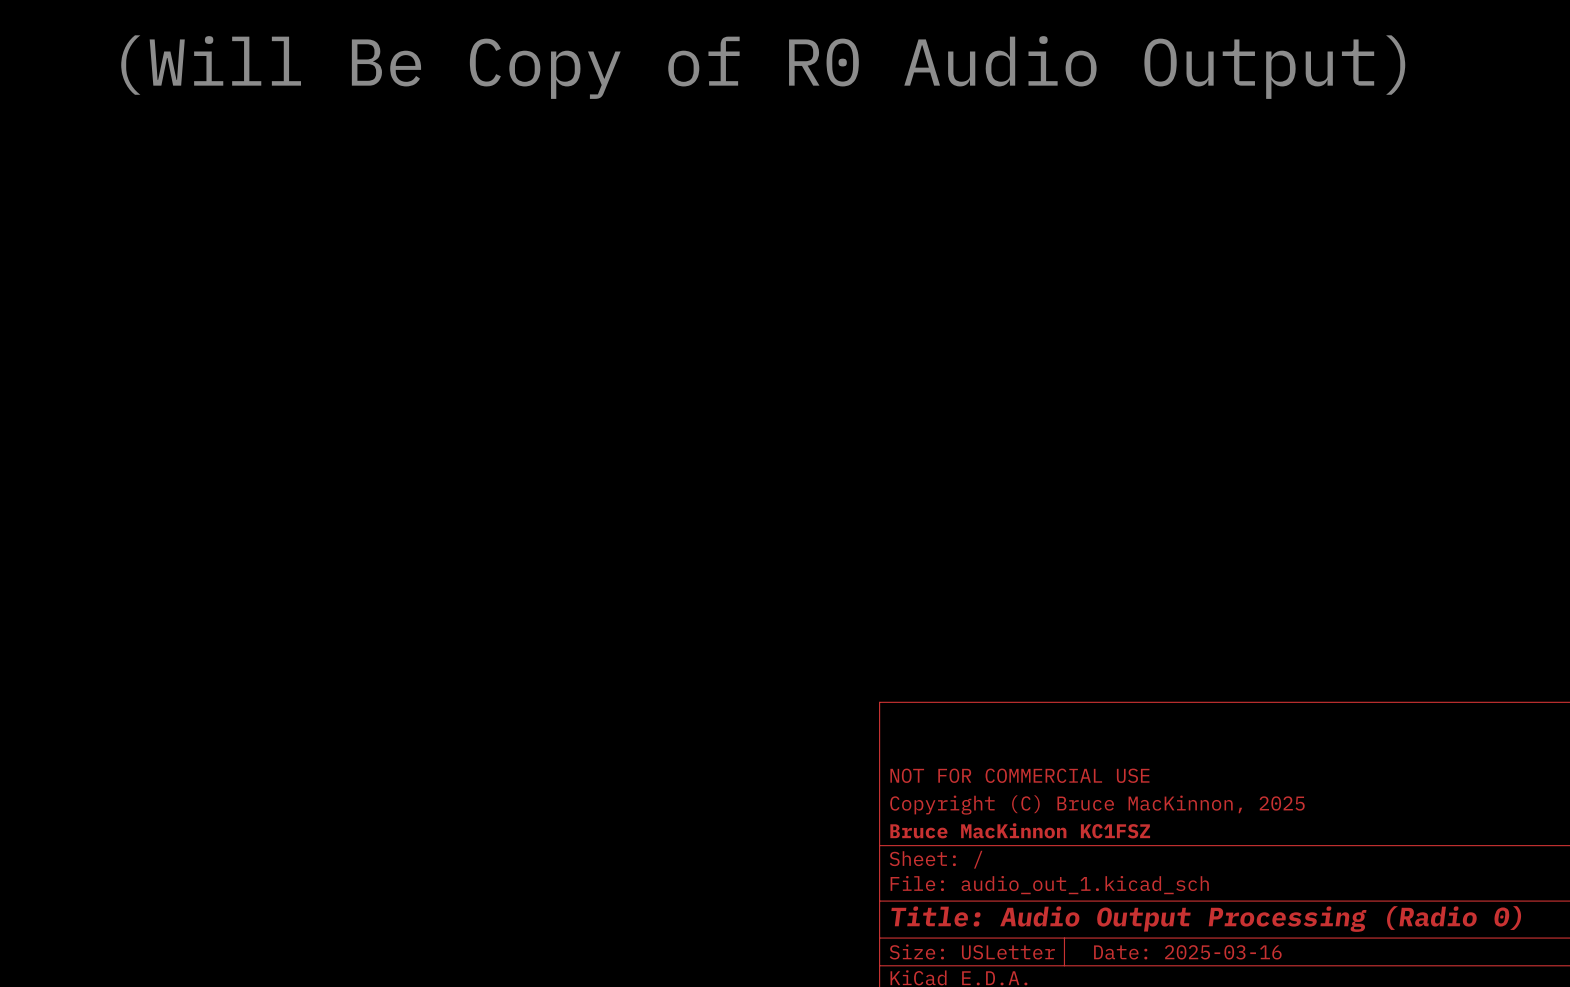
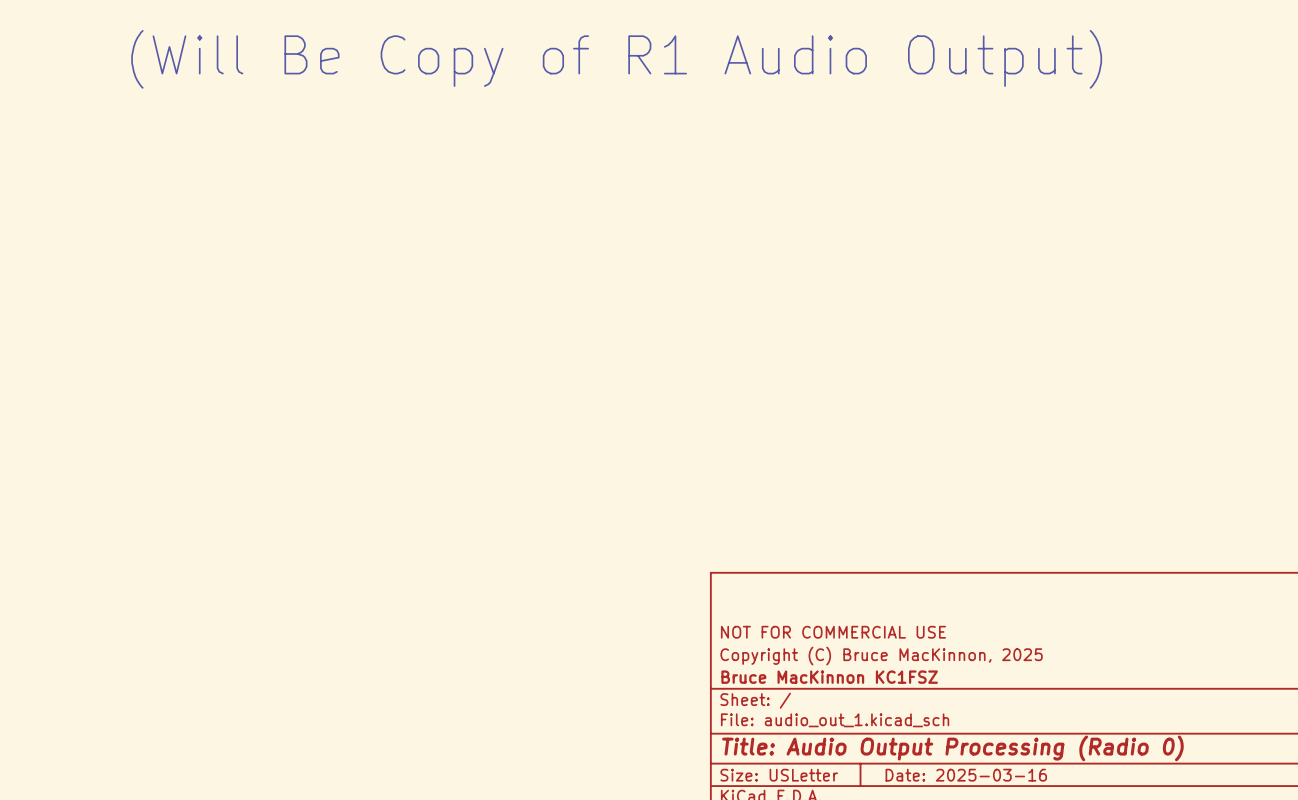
text: (Will Be Copy of R0 Audio Output) (763, 67) -> (Will Be Copy of R1 Audio Output) (616, 59)

